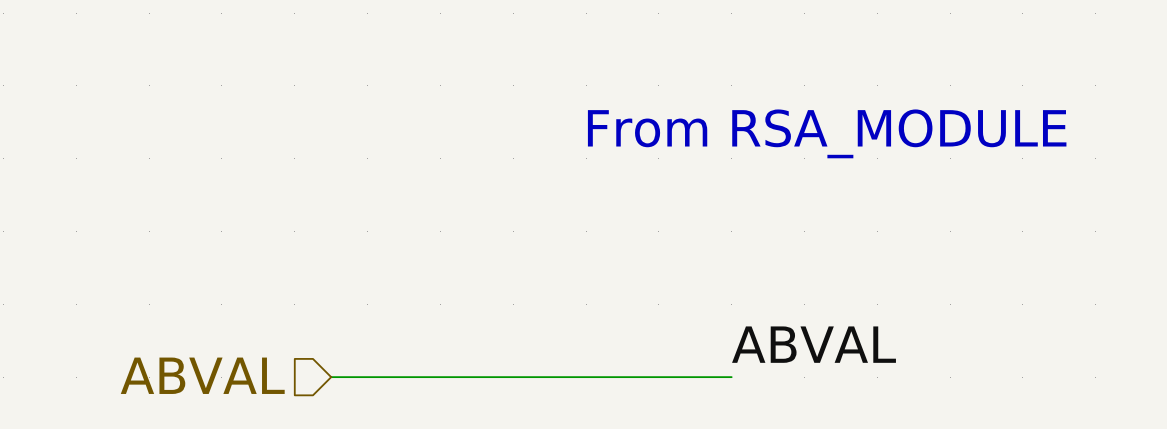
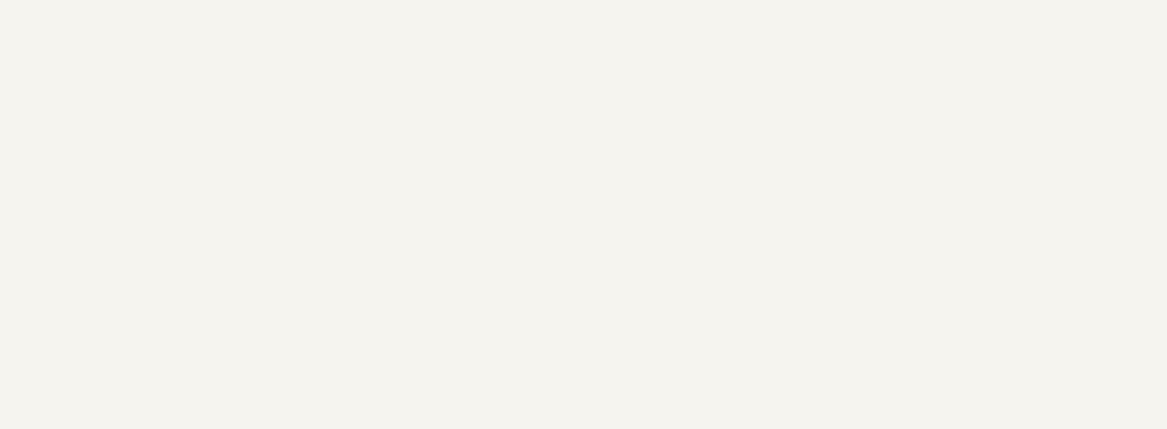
text: From RSA_MODULE (827, 133) -> none
label: ABVAL (814, 344) -> none
hierarchical label: ABVAL (202, 375) -> none
wire: (331, 377) (731, 377) -> none

